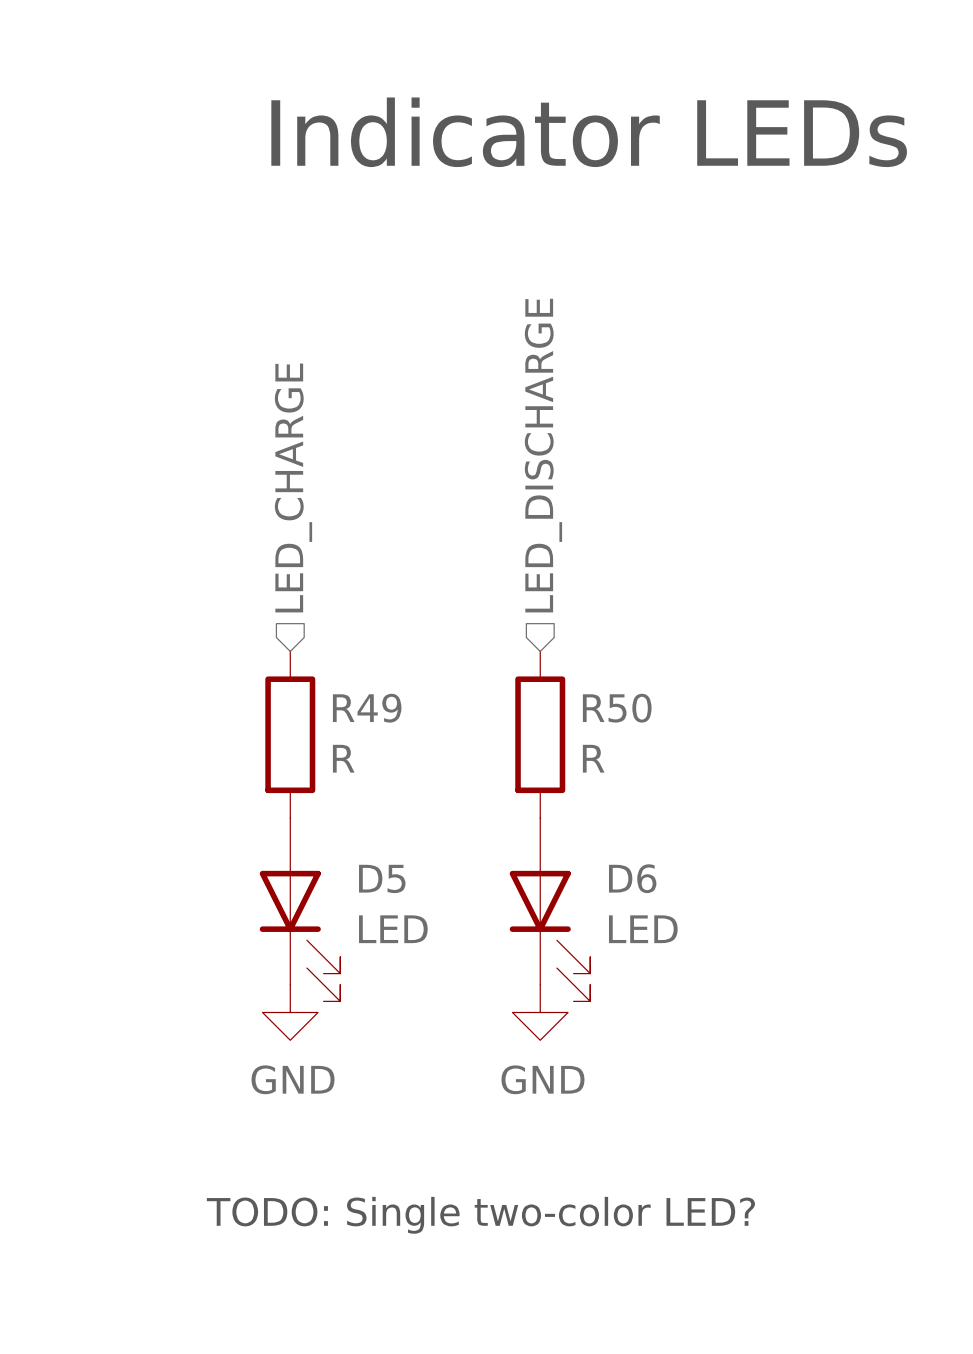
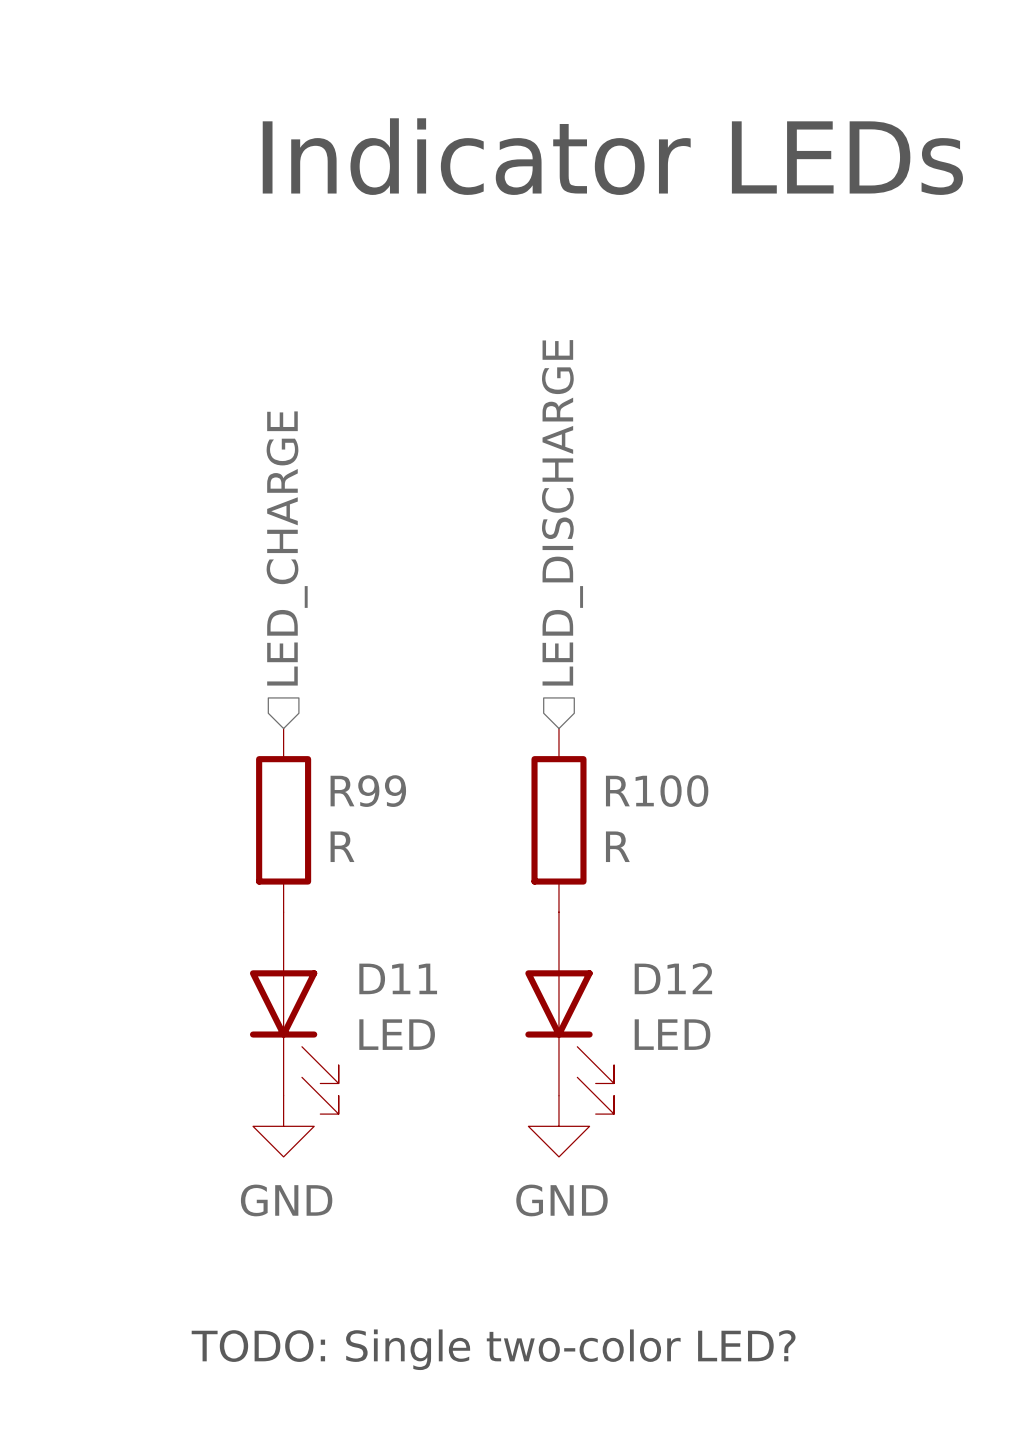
R49 name: R49 (367, 708) -> R99 (368, 791)
R50 name: R50 (617, 708) -> R100 (657, 791)
D5 name: D5 (382, 878) -> D11 (398, 978)
D6 name: D6 (632, 878) -> D12 (673, 978)

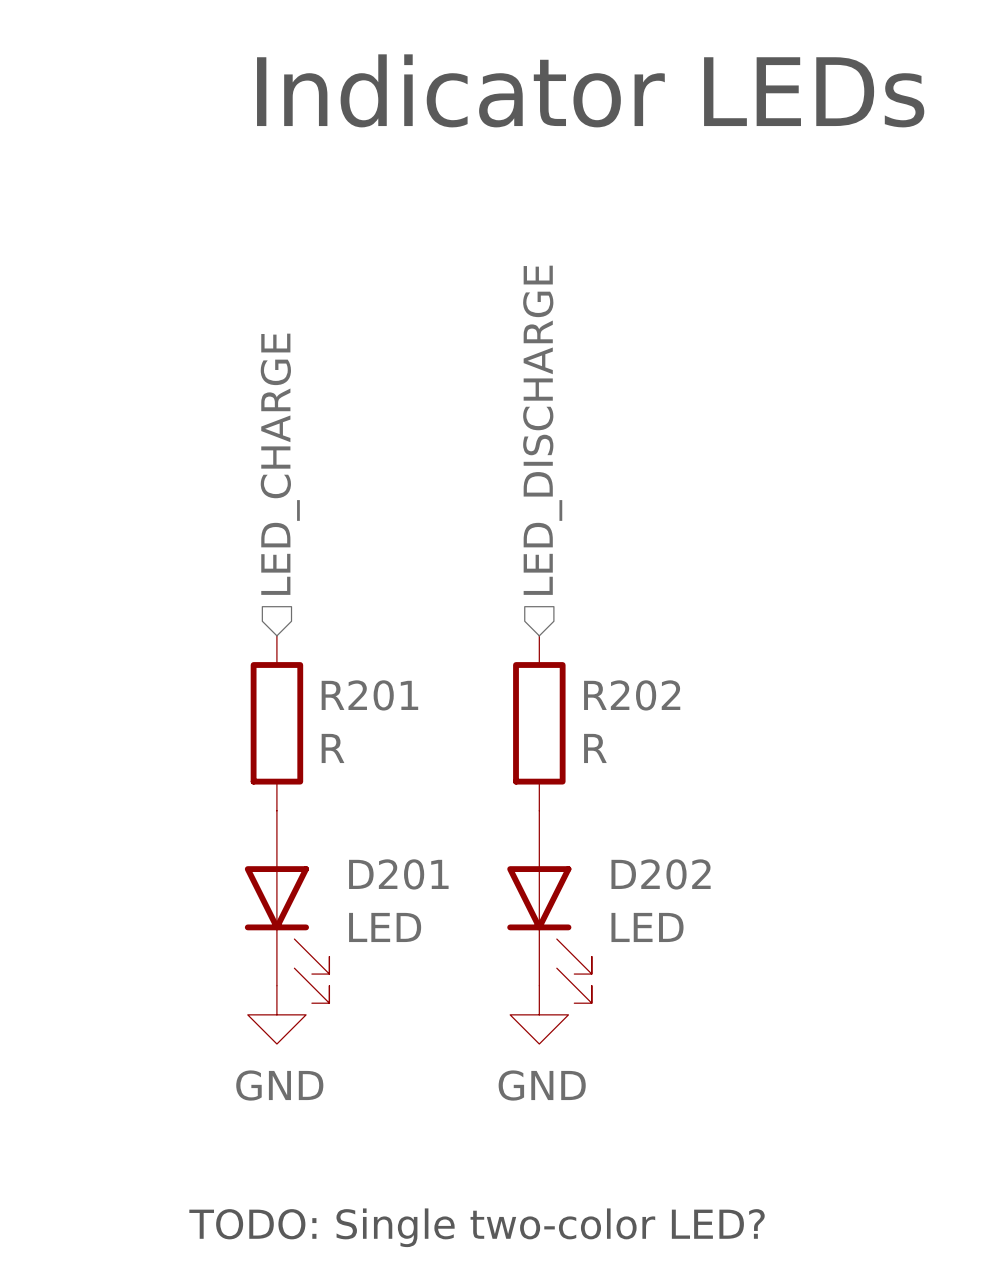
R99 name: R99 (368, 791) -> R201 (369, 695)
R100 name: R100 (657, 791) -> R202 (632, 695)
D11 name: D11 (398, 978) -> D201 (398, 874)
D12 name: D12 (673, 978) -> D202 (661, 874)

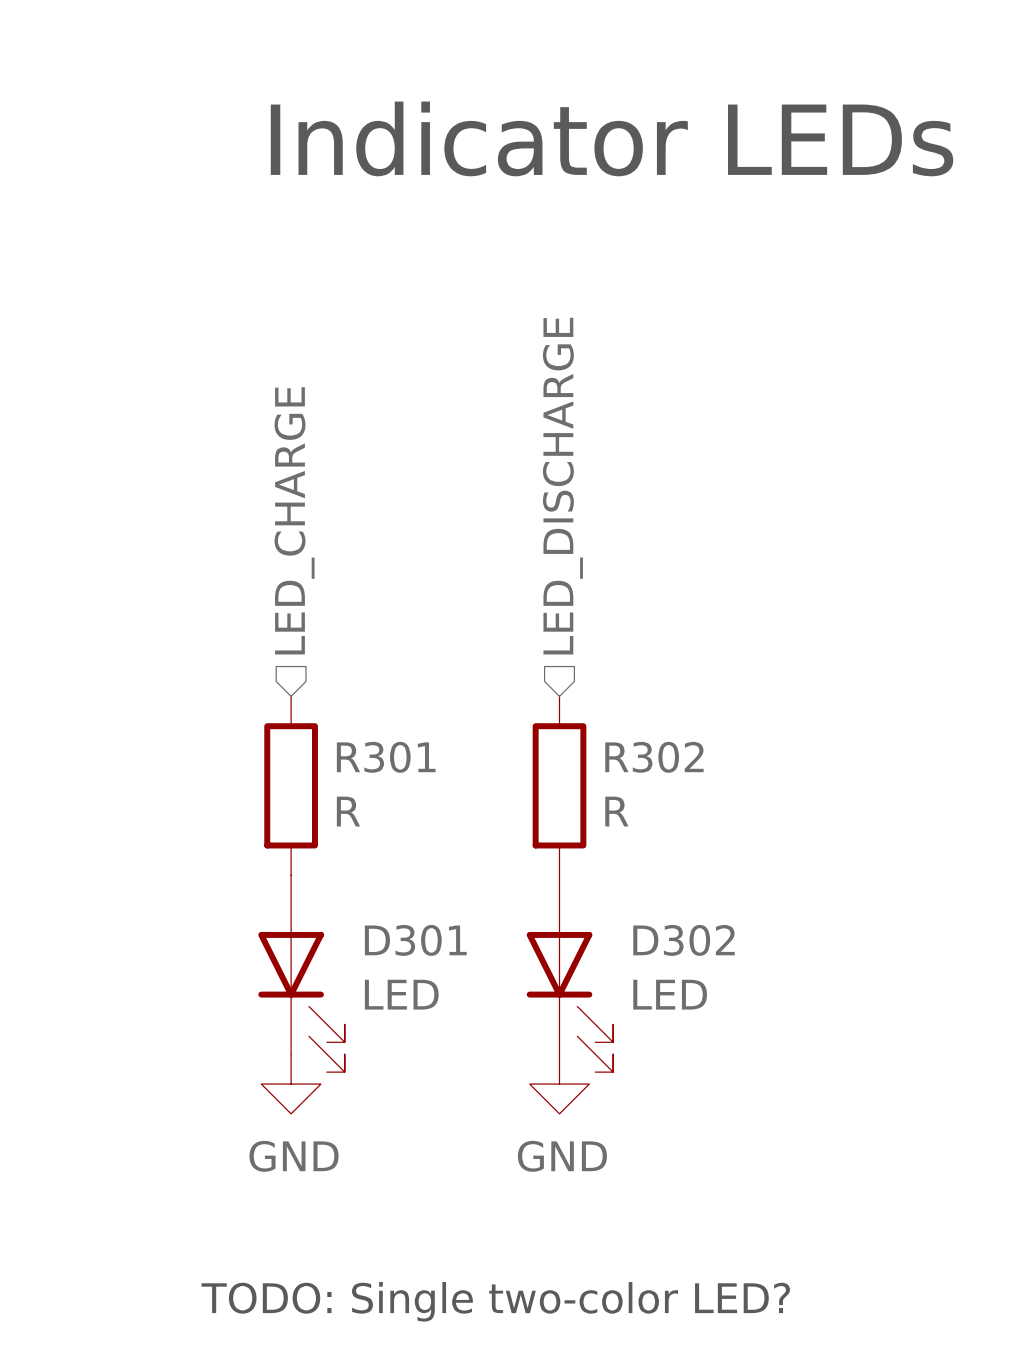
R201 name: R201 (369, 695) -> R301 (386, 757)
R202 name: R202 (632, 695) -> R302 (654, 757)
D201 name: D201 (398, 874) -> D301 (415, 940)
D202 name: D202 (661, 874) -> D302 (684, 940)

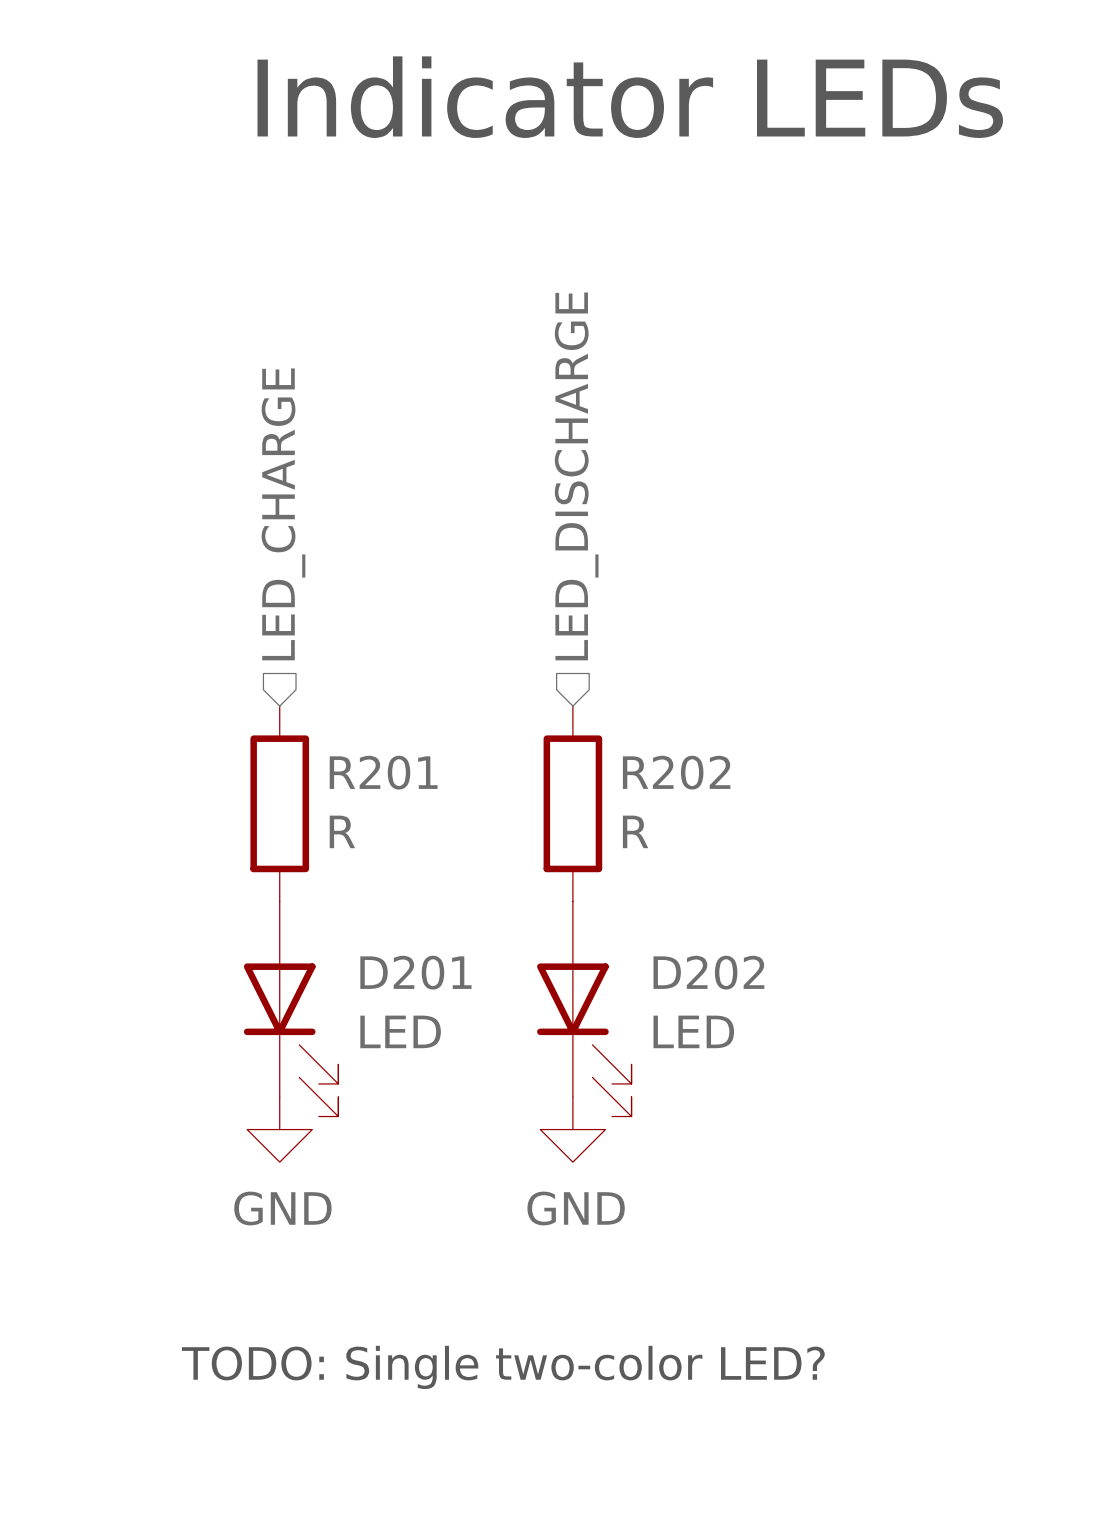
R301 name: R301 (386, 757) -> R201 (383, 772)
R302 name: R302 (654, 757) -> R202 (676, 772)
D301 name: D301 (415, 940) -> D201 (415, 972)
D302 name: D302 (684, 940) -> D202 (708, 972)

